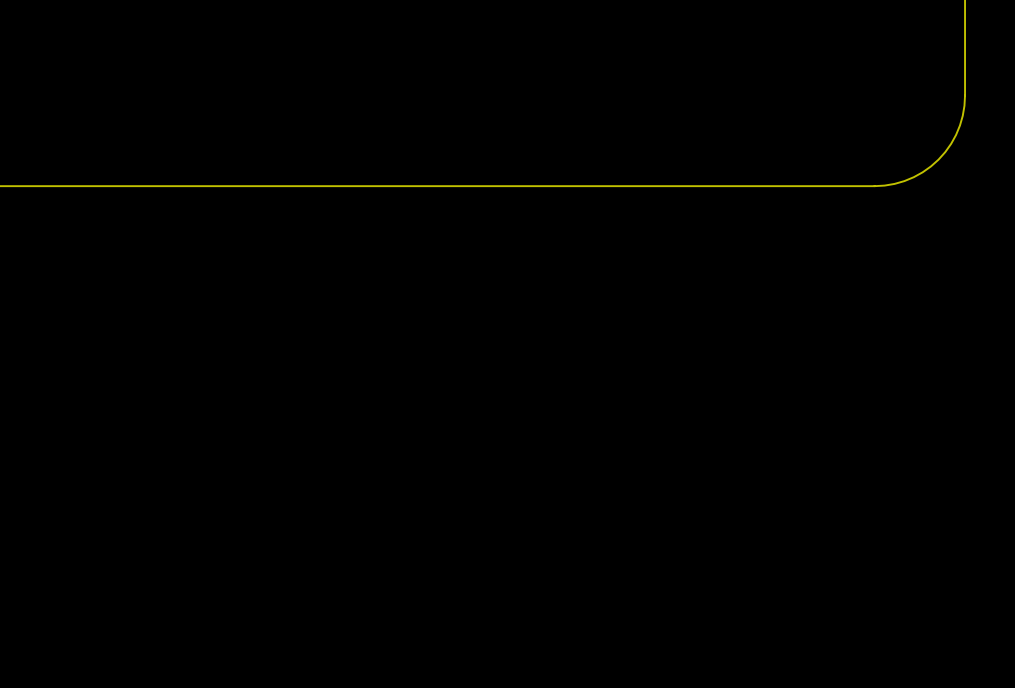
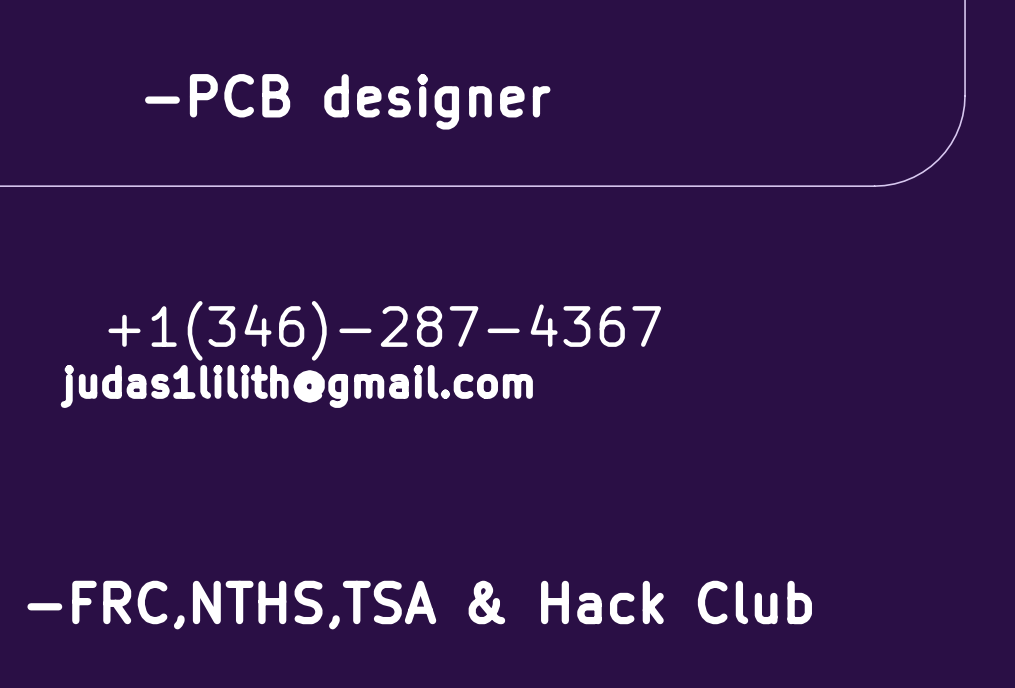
text: none -> -PCB designer (347, 101)
text: none -> +1(346)-287-4367 (384, 330)
text: none -> judas1lilith@gmail.com (296, 386)
text: none -> -FRC,NTHS,TSA & Hack Club (419, 605)

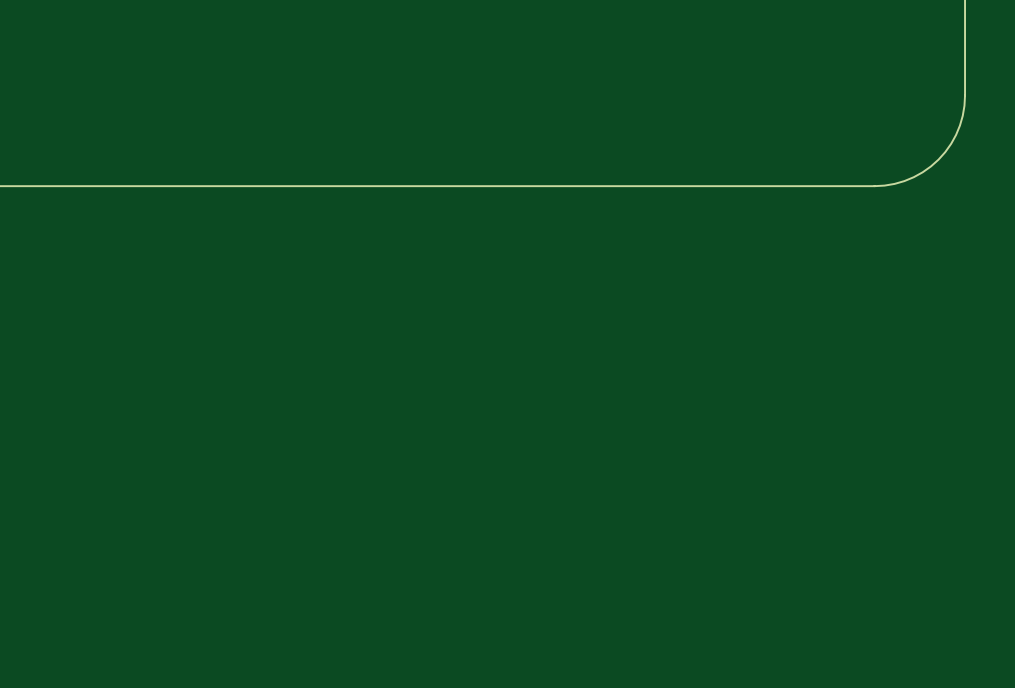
text: -PCB designer (347, 101) -> none
text: +1(346)-287-4367 (384, 330) -> none
text: judas1lilith@gmail.com (296, 386) -> none
text: -FRC,NTHS,TSA & Hack Club (419, 605) -> none

